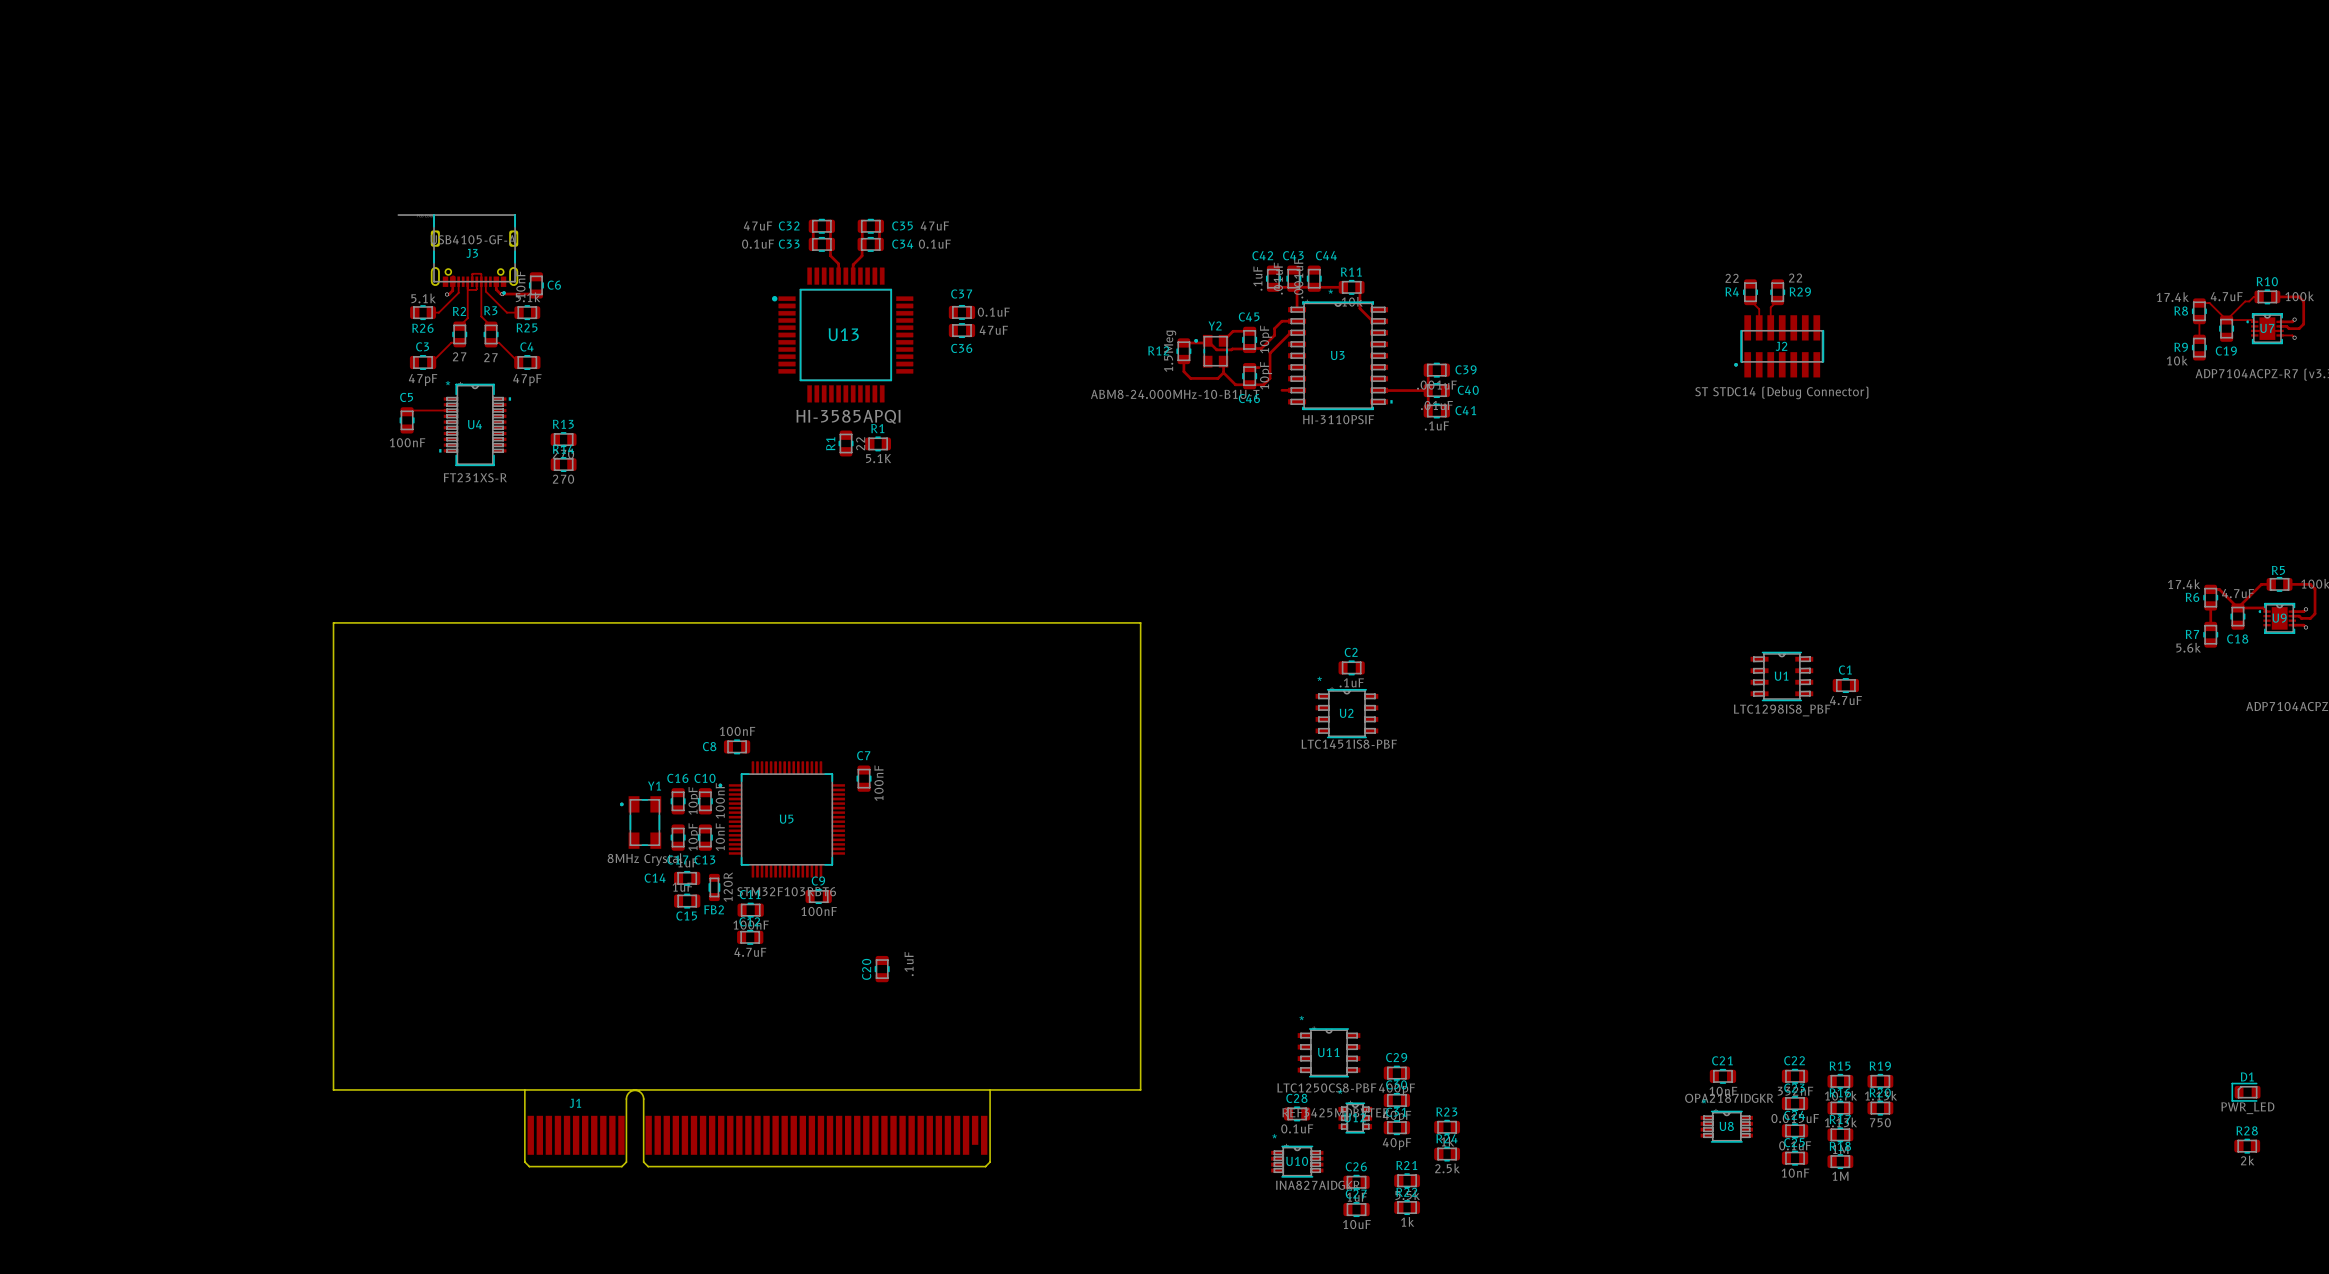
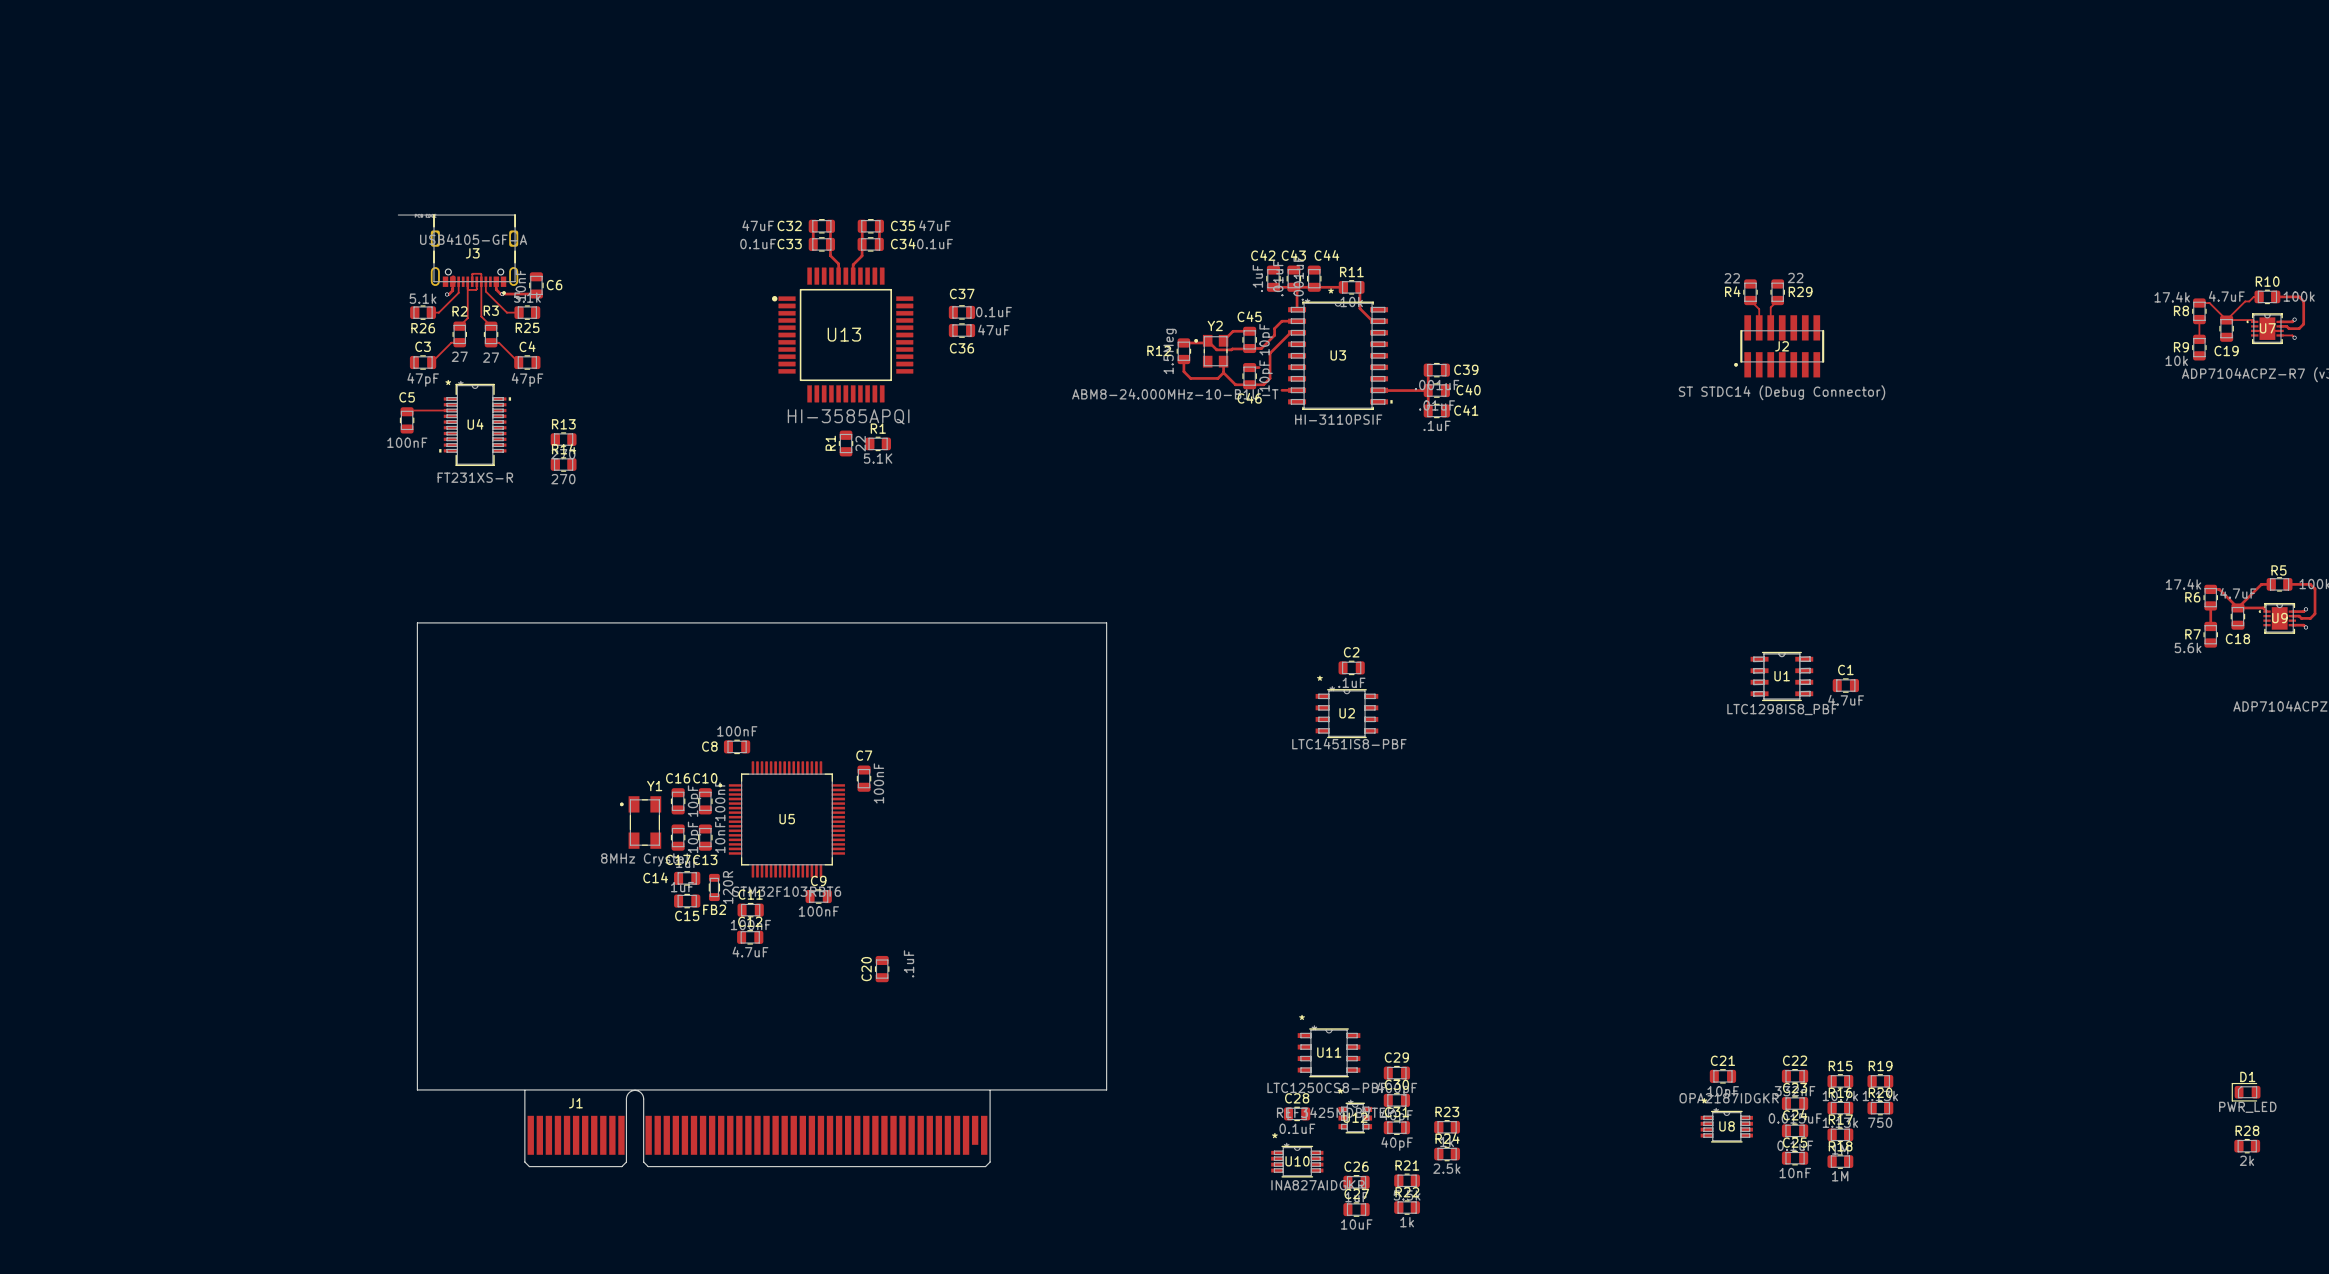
board edge: (417, 622) (333, 622) (333, 1089) (417, 1089) -> (417, 622) (417, 1089)
board edge: (1106, 622) (1140, 622) (1140, 1089) (1106, 1089) -> (1106, 622) (1106, 1089)

